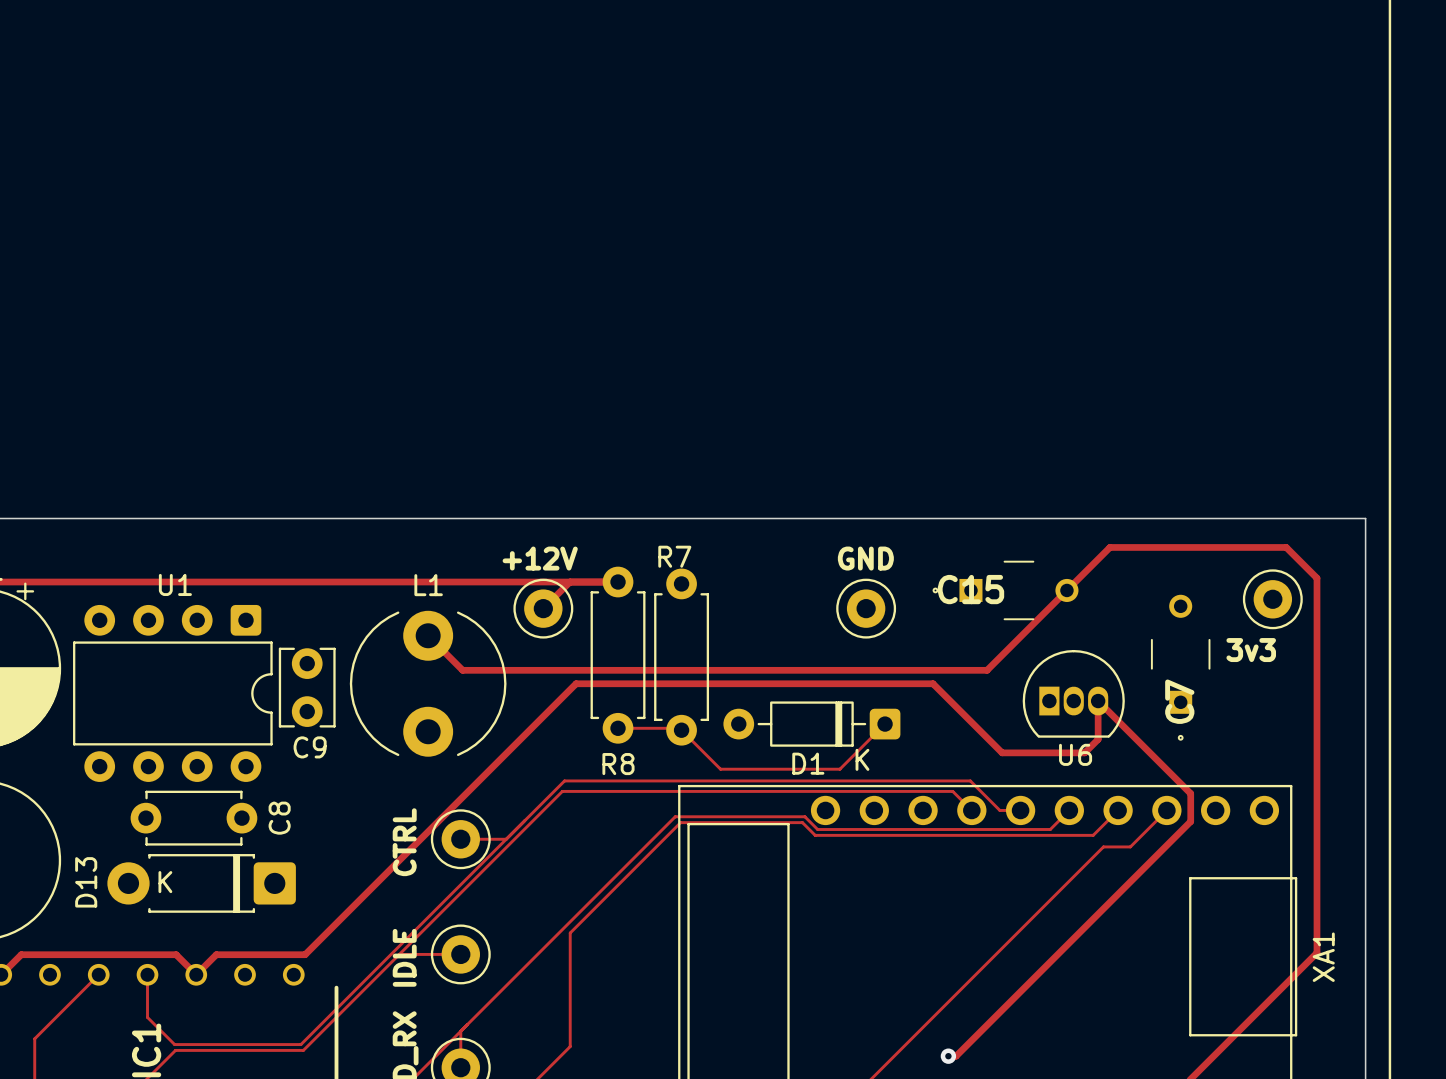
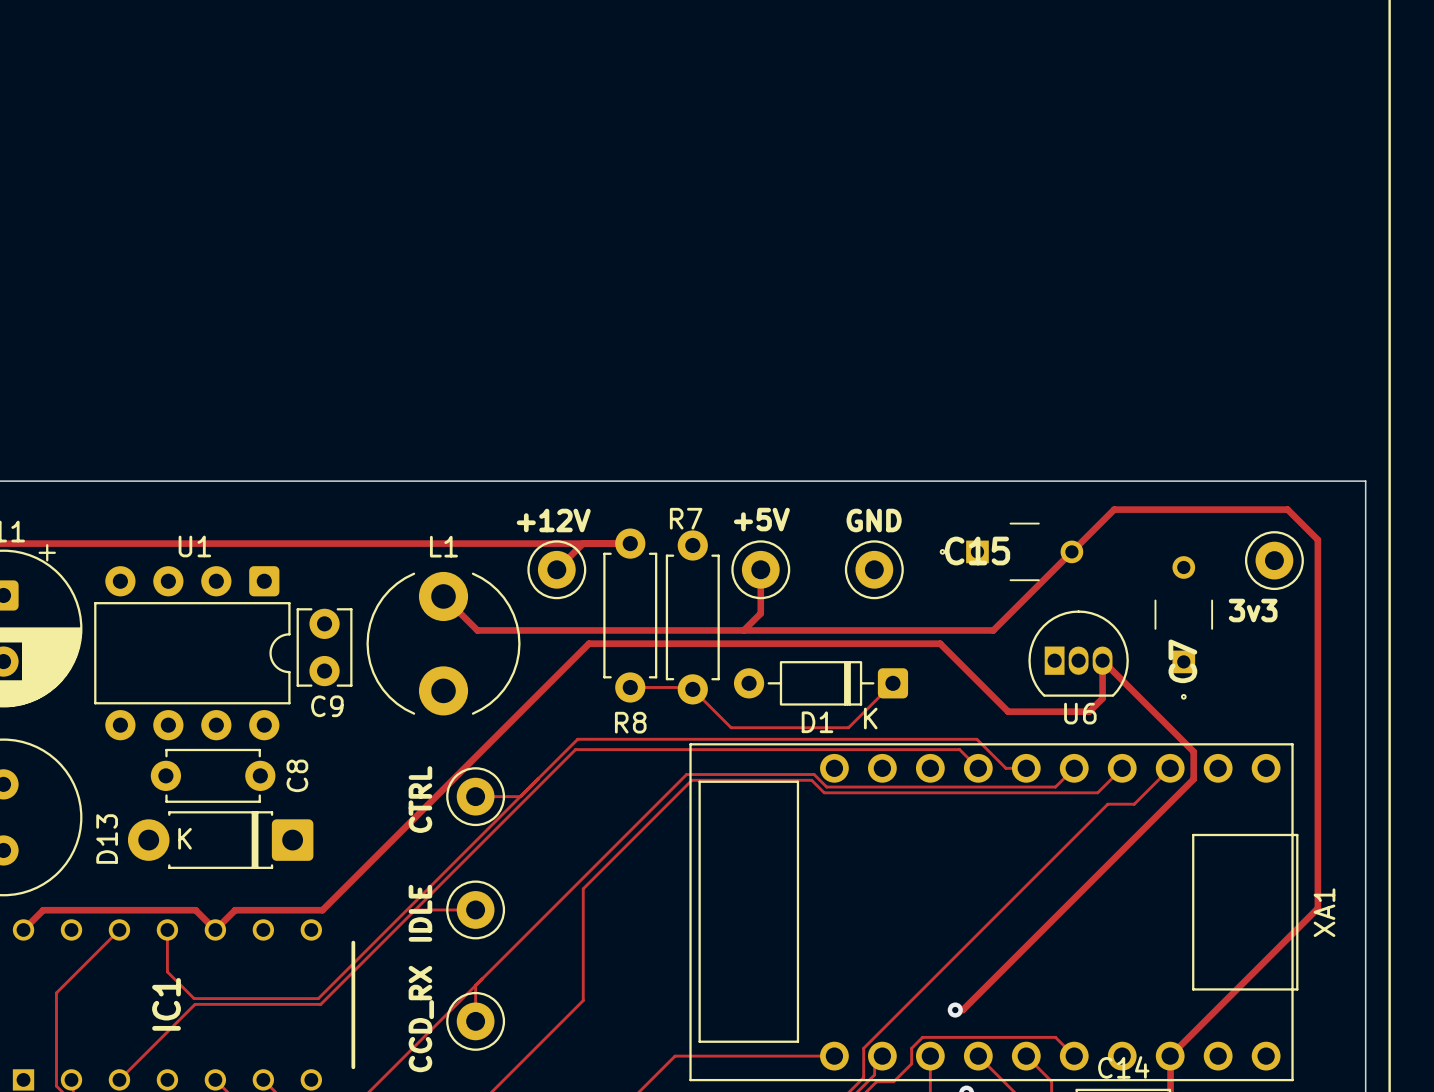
text: none -> +5V (761, 519)
track: none -> (760, 569) (760, 613) (743, 630)
part: none -> (760, 569)

